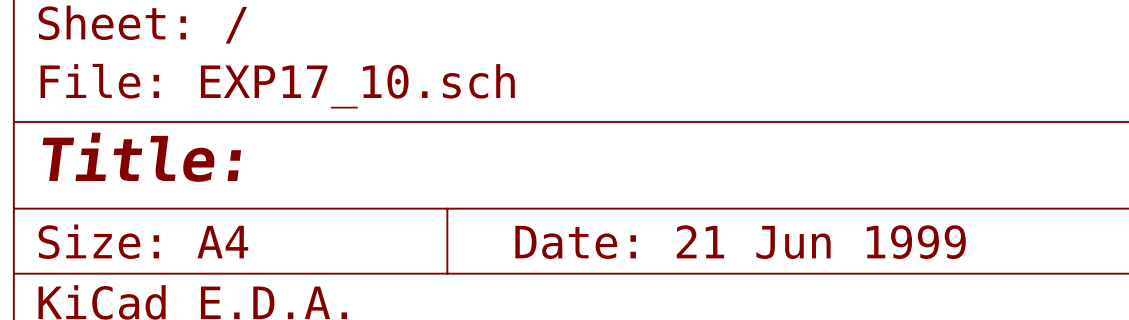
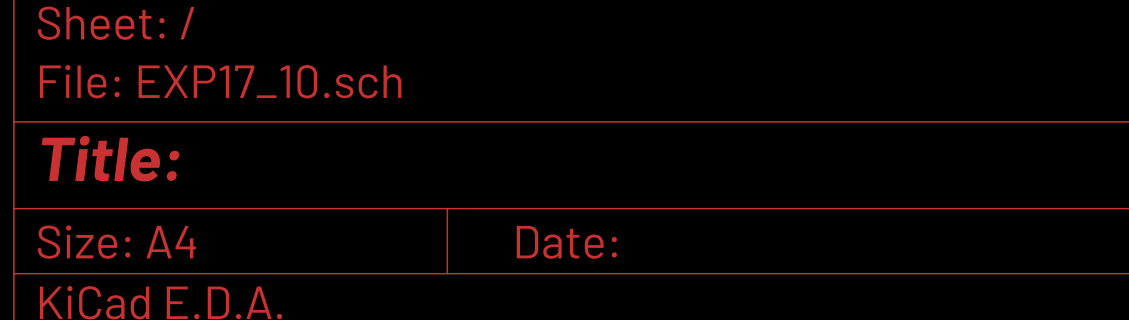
title block: Date: 21 Jun 1999 (740, 242) -> Date: (566, 242)

